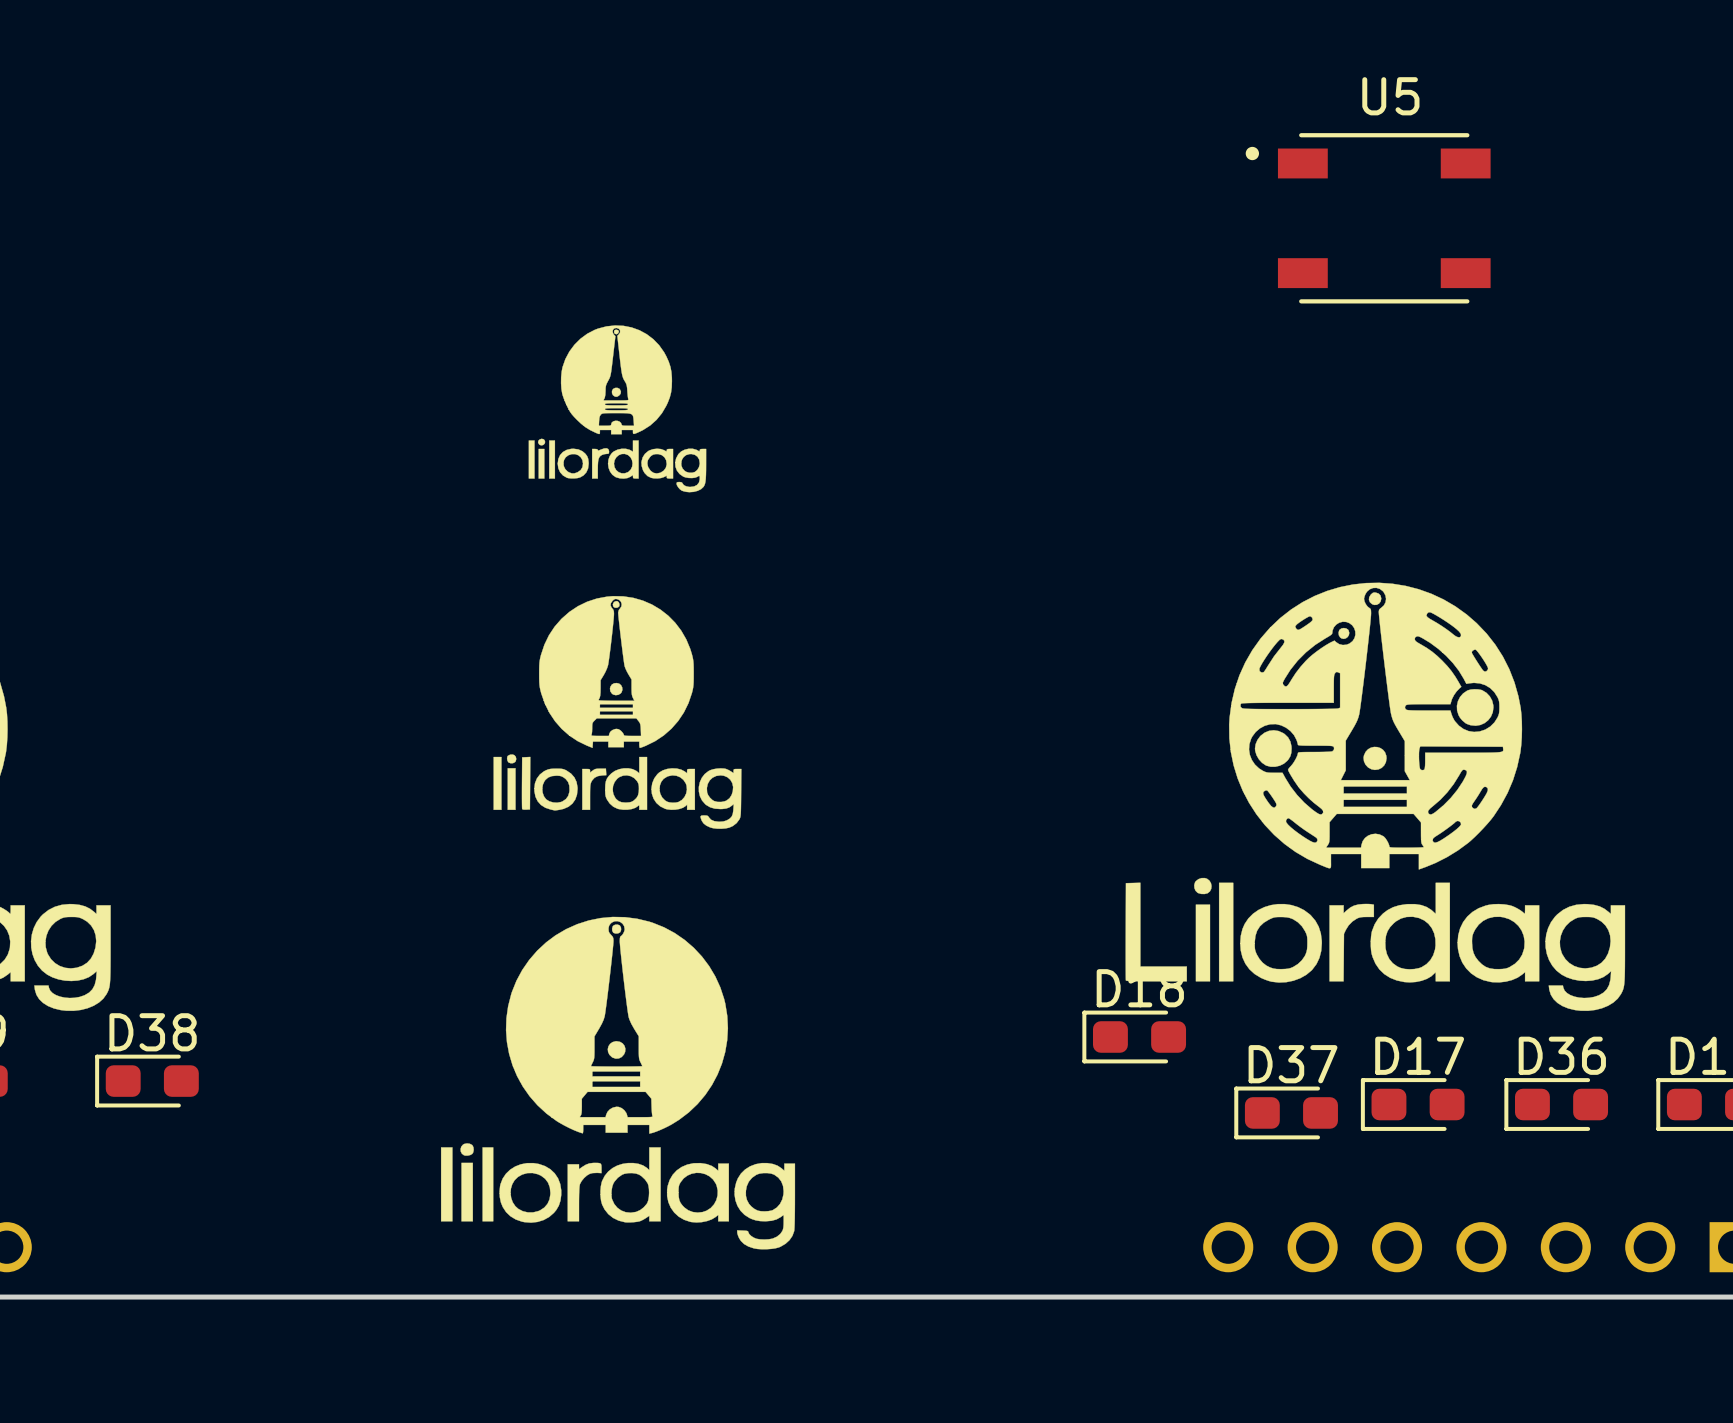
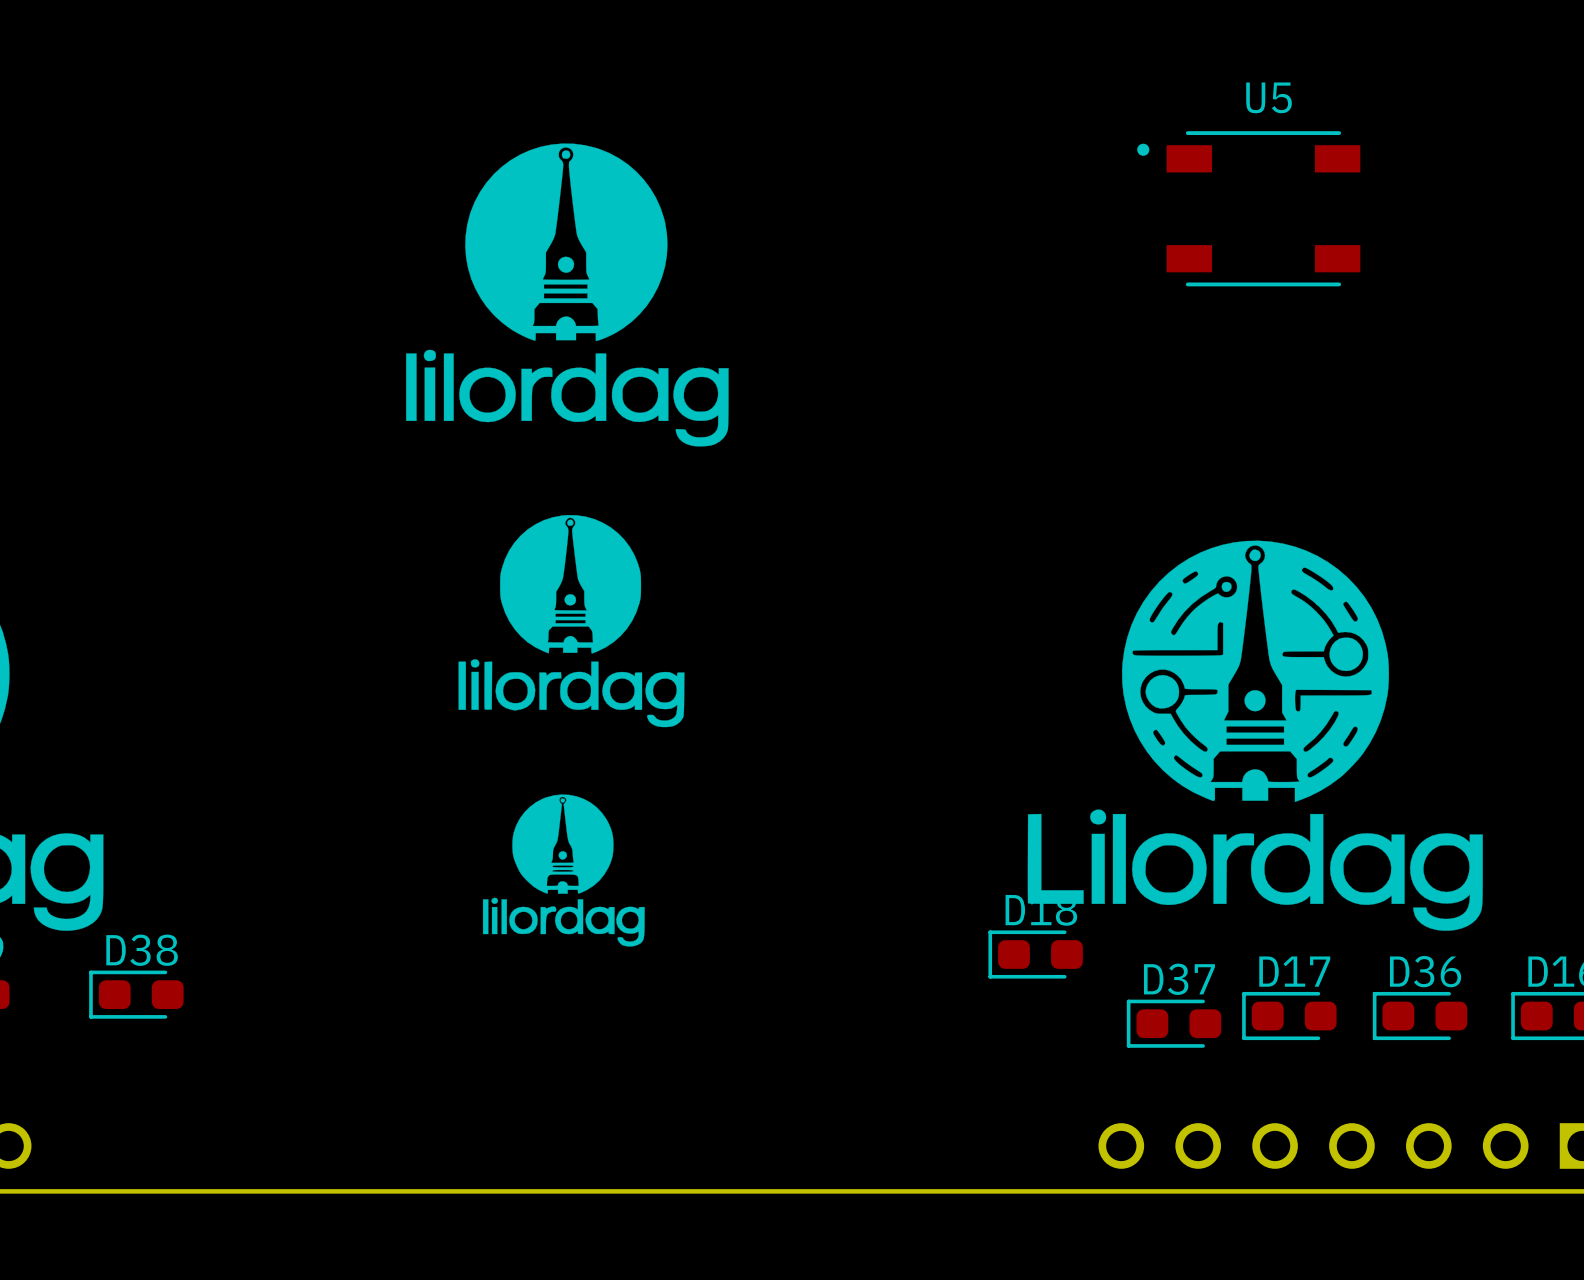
drawing position: (617, 408) -> (563, 870)
drawing position: (617, 712) -> (571, 621)
drawing position: (618, 1083) -> (567, 294)

